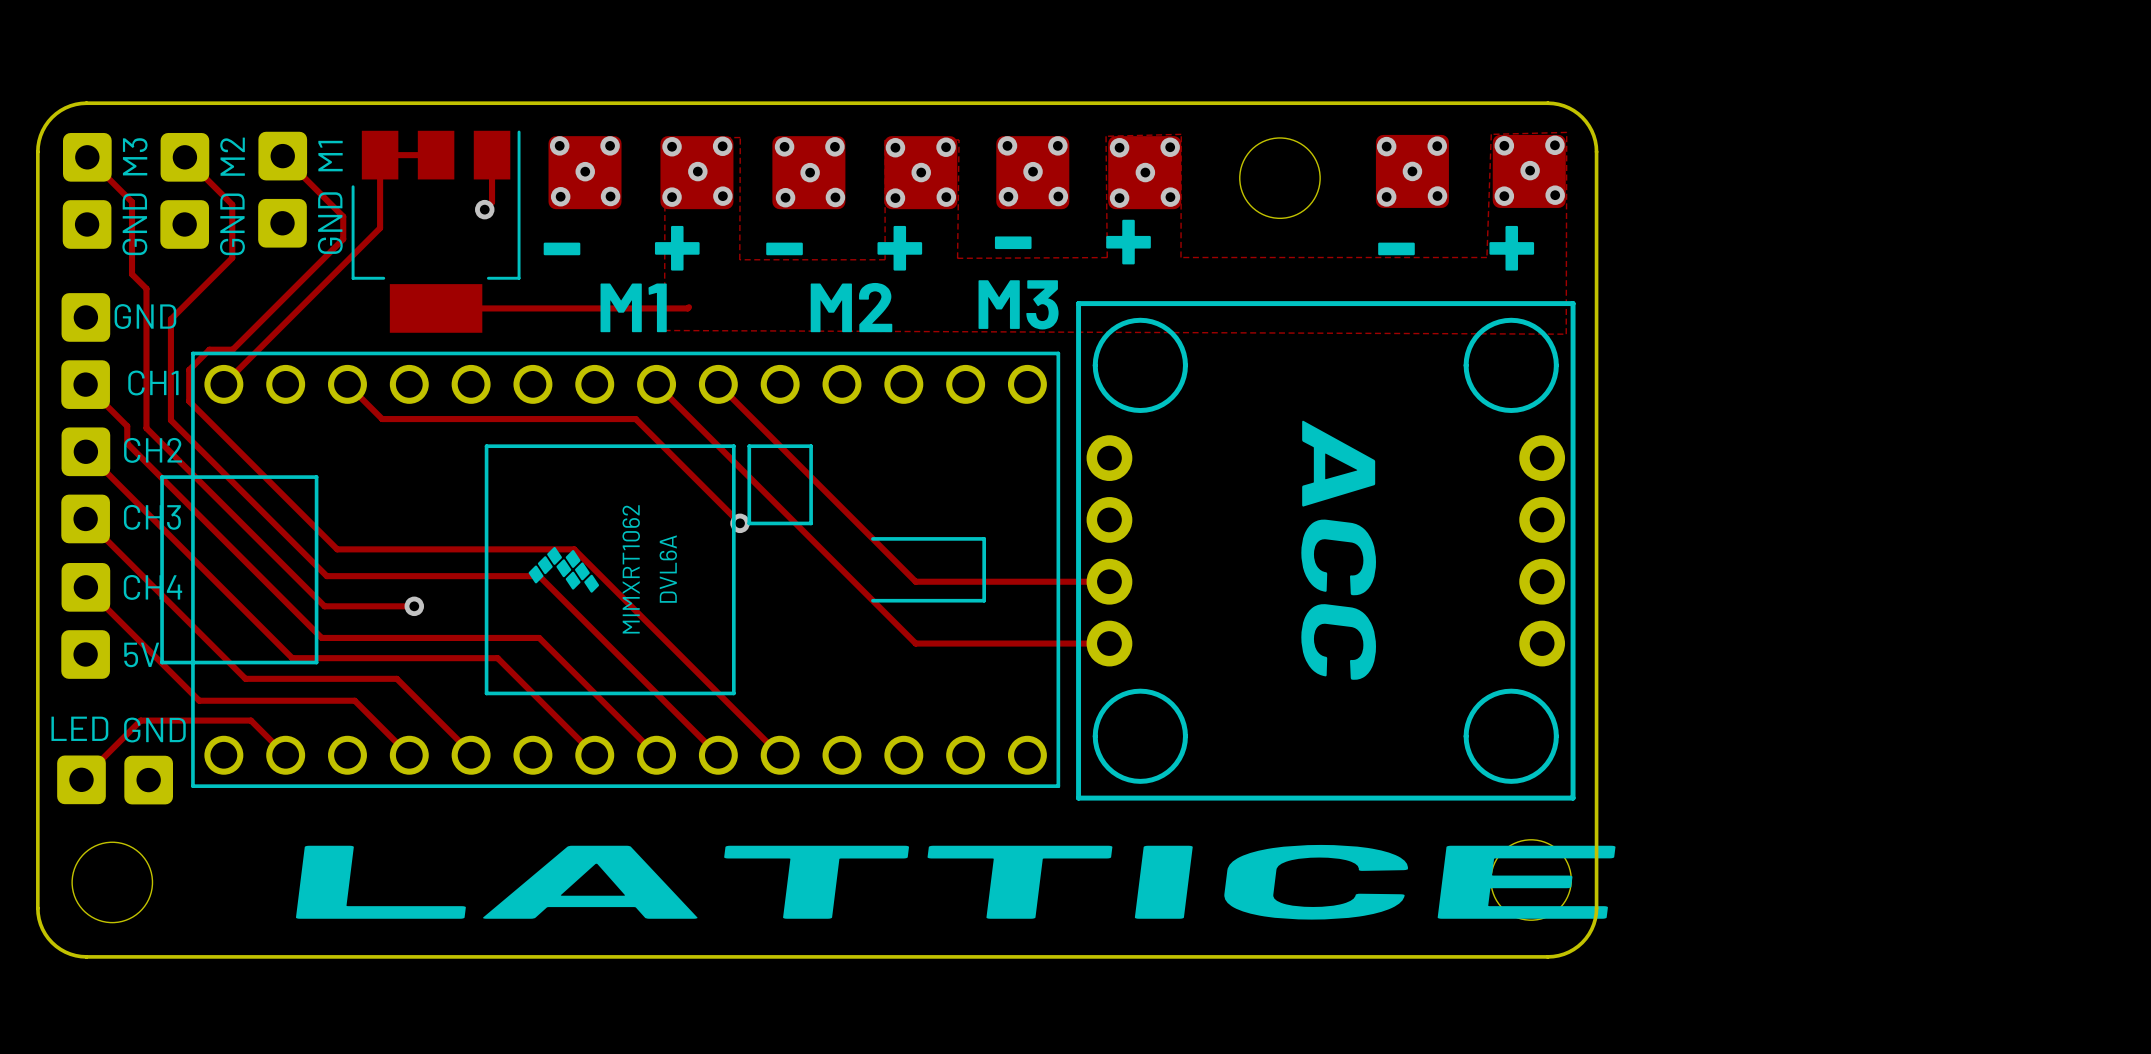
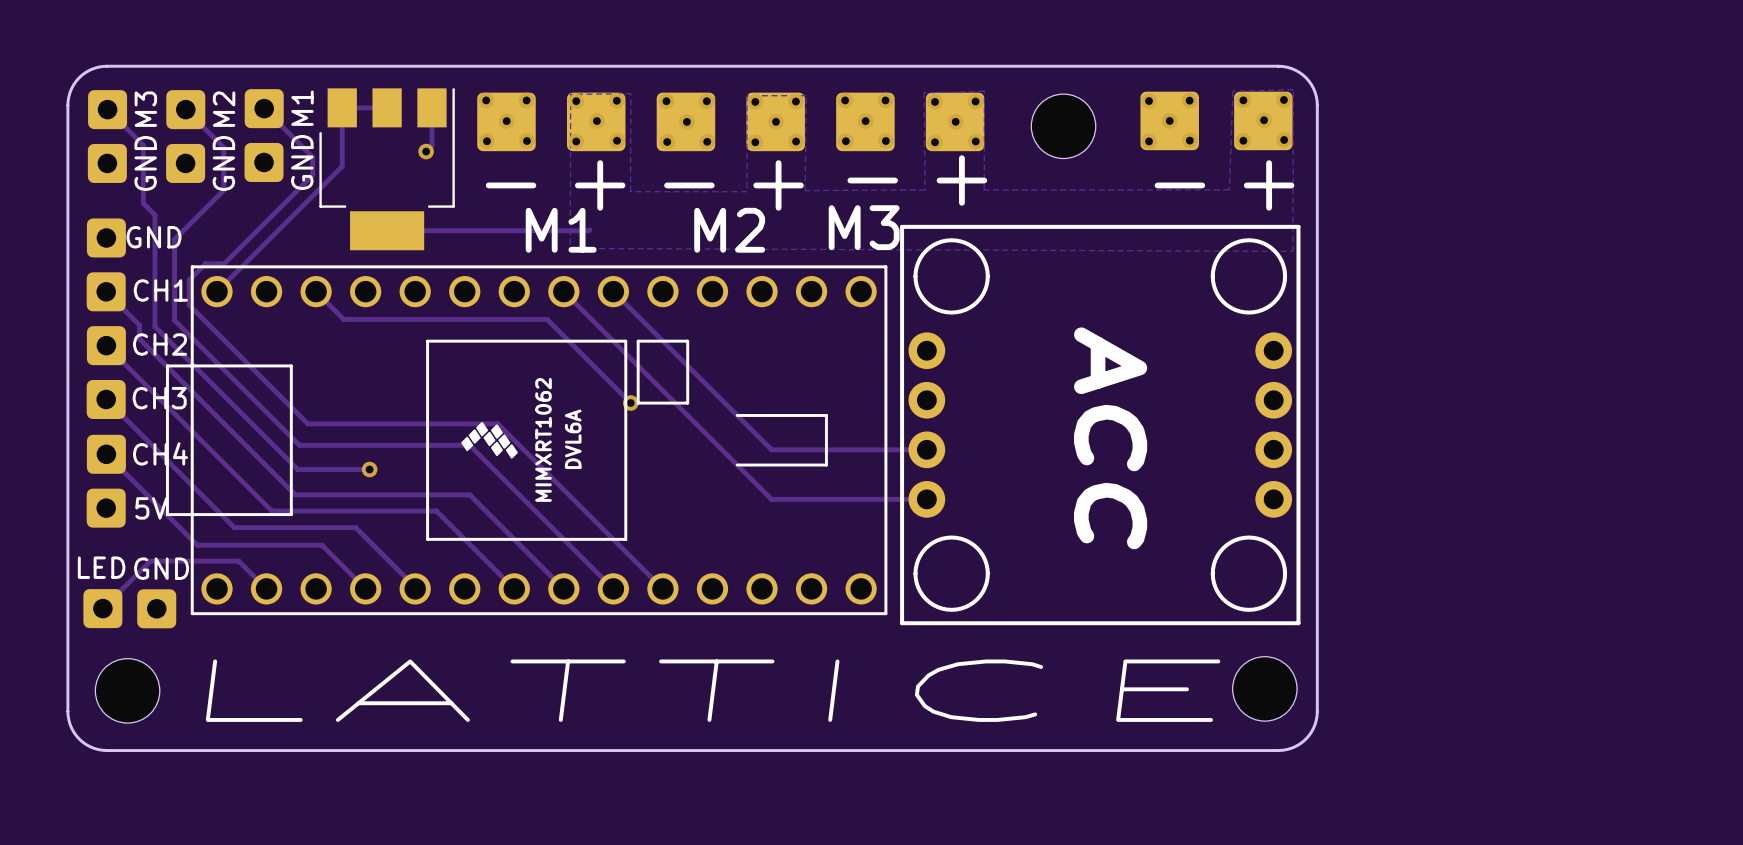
text position: LATTICE (955, 882) -> LATTICE (713, 690)

